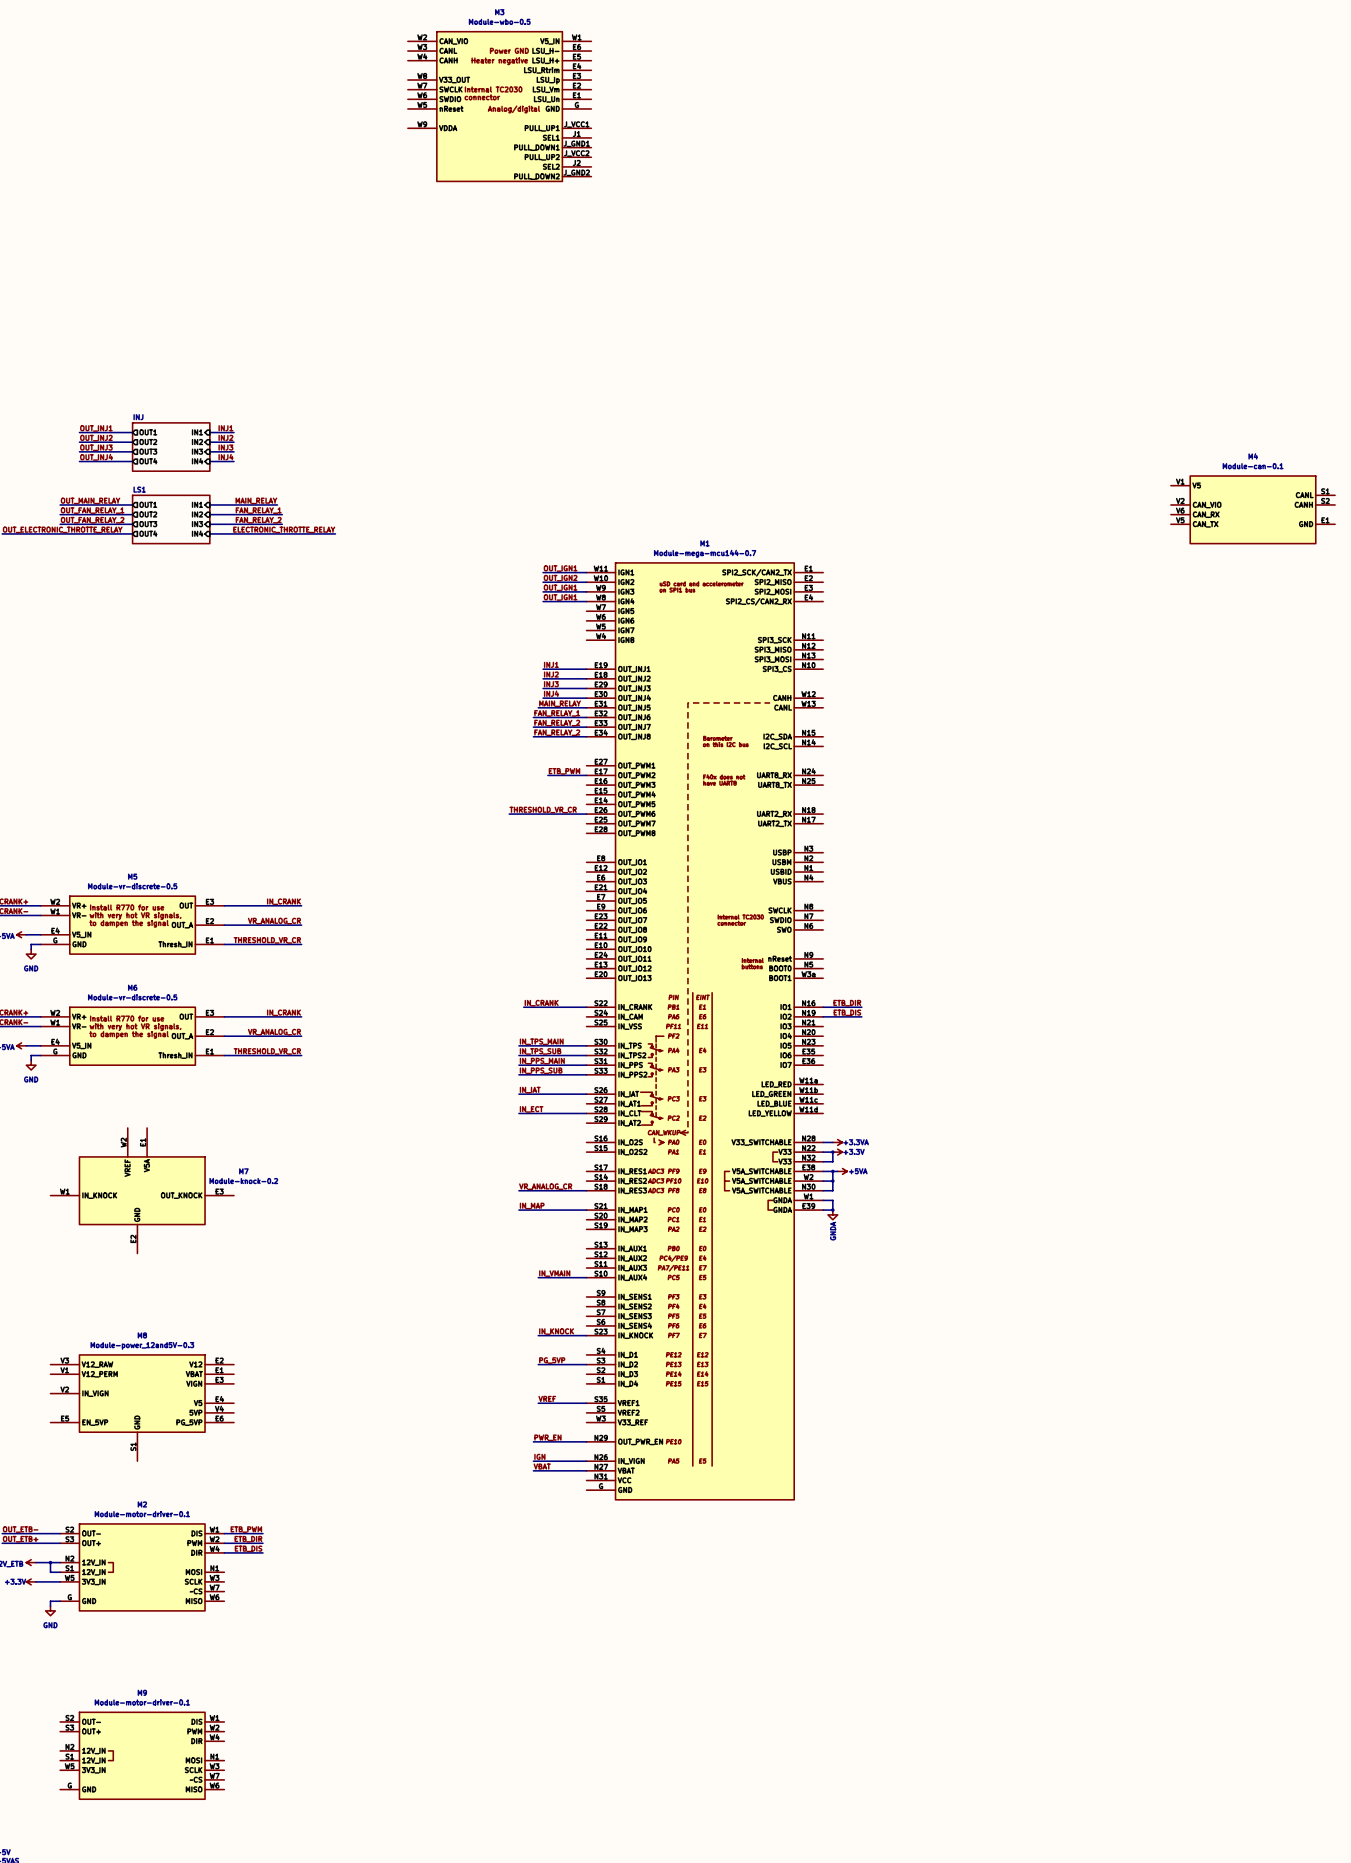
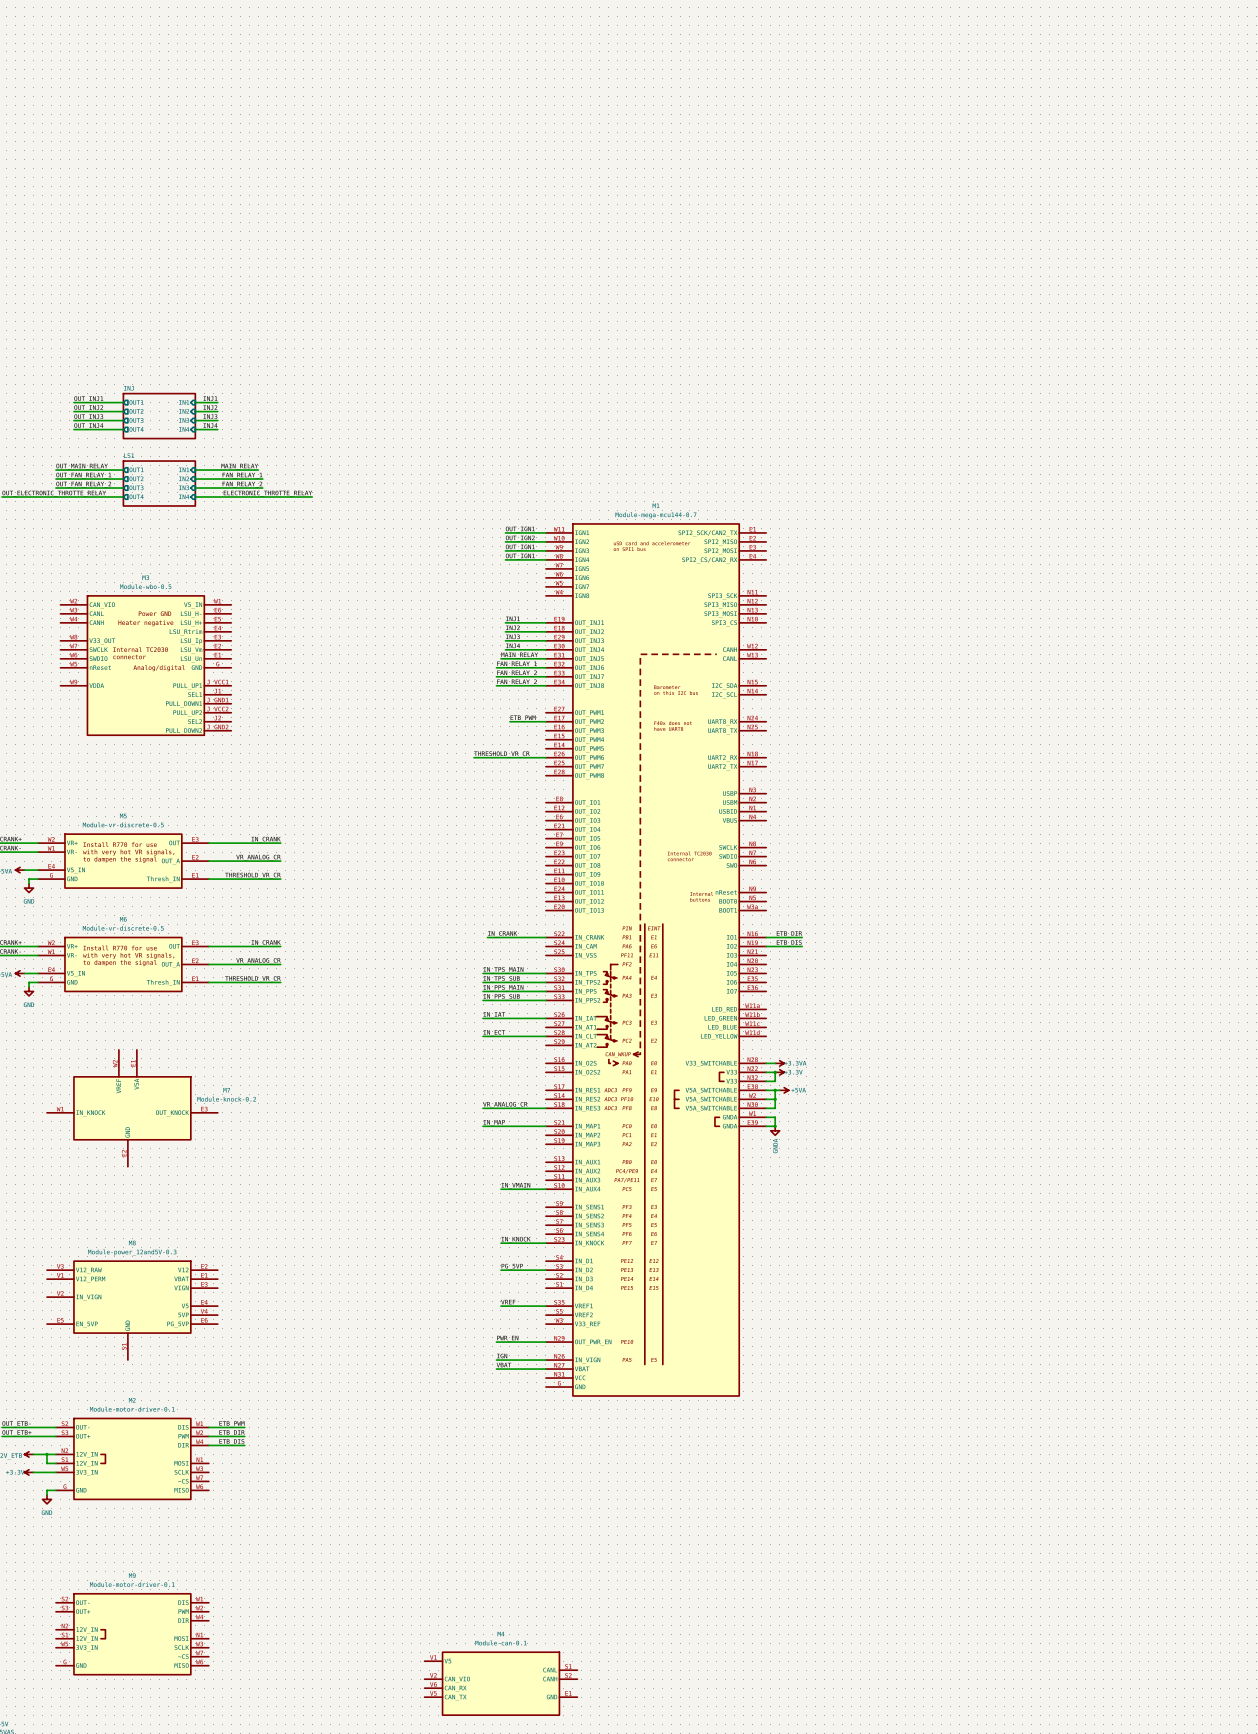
part position: (499, 106) -> (145, 665)
part position: (1252, 509) -> (500, 1683)

